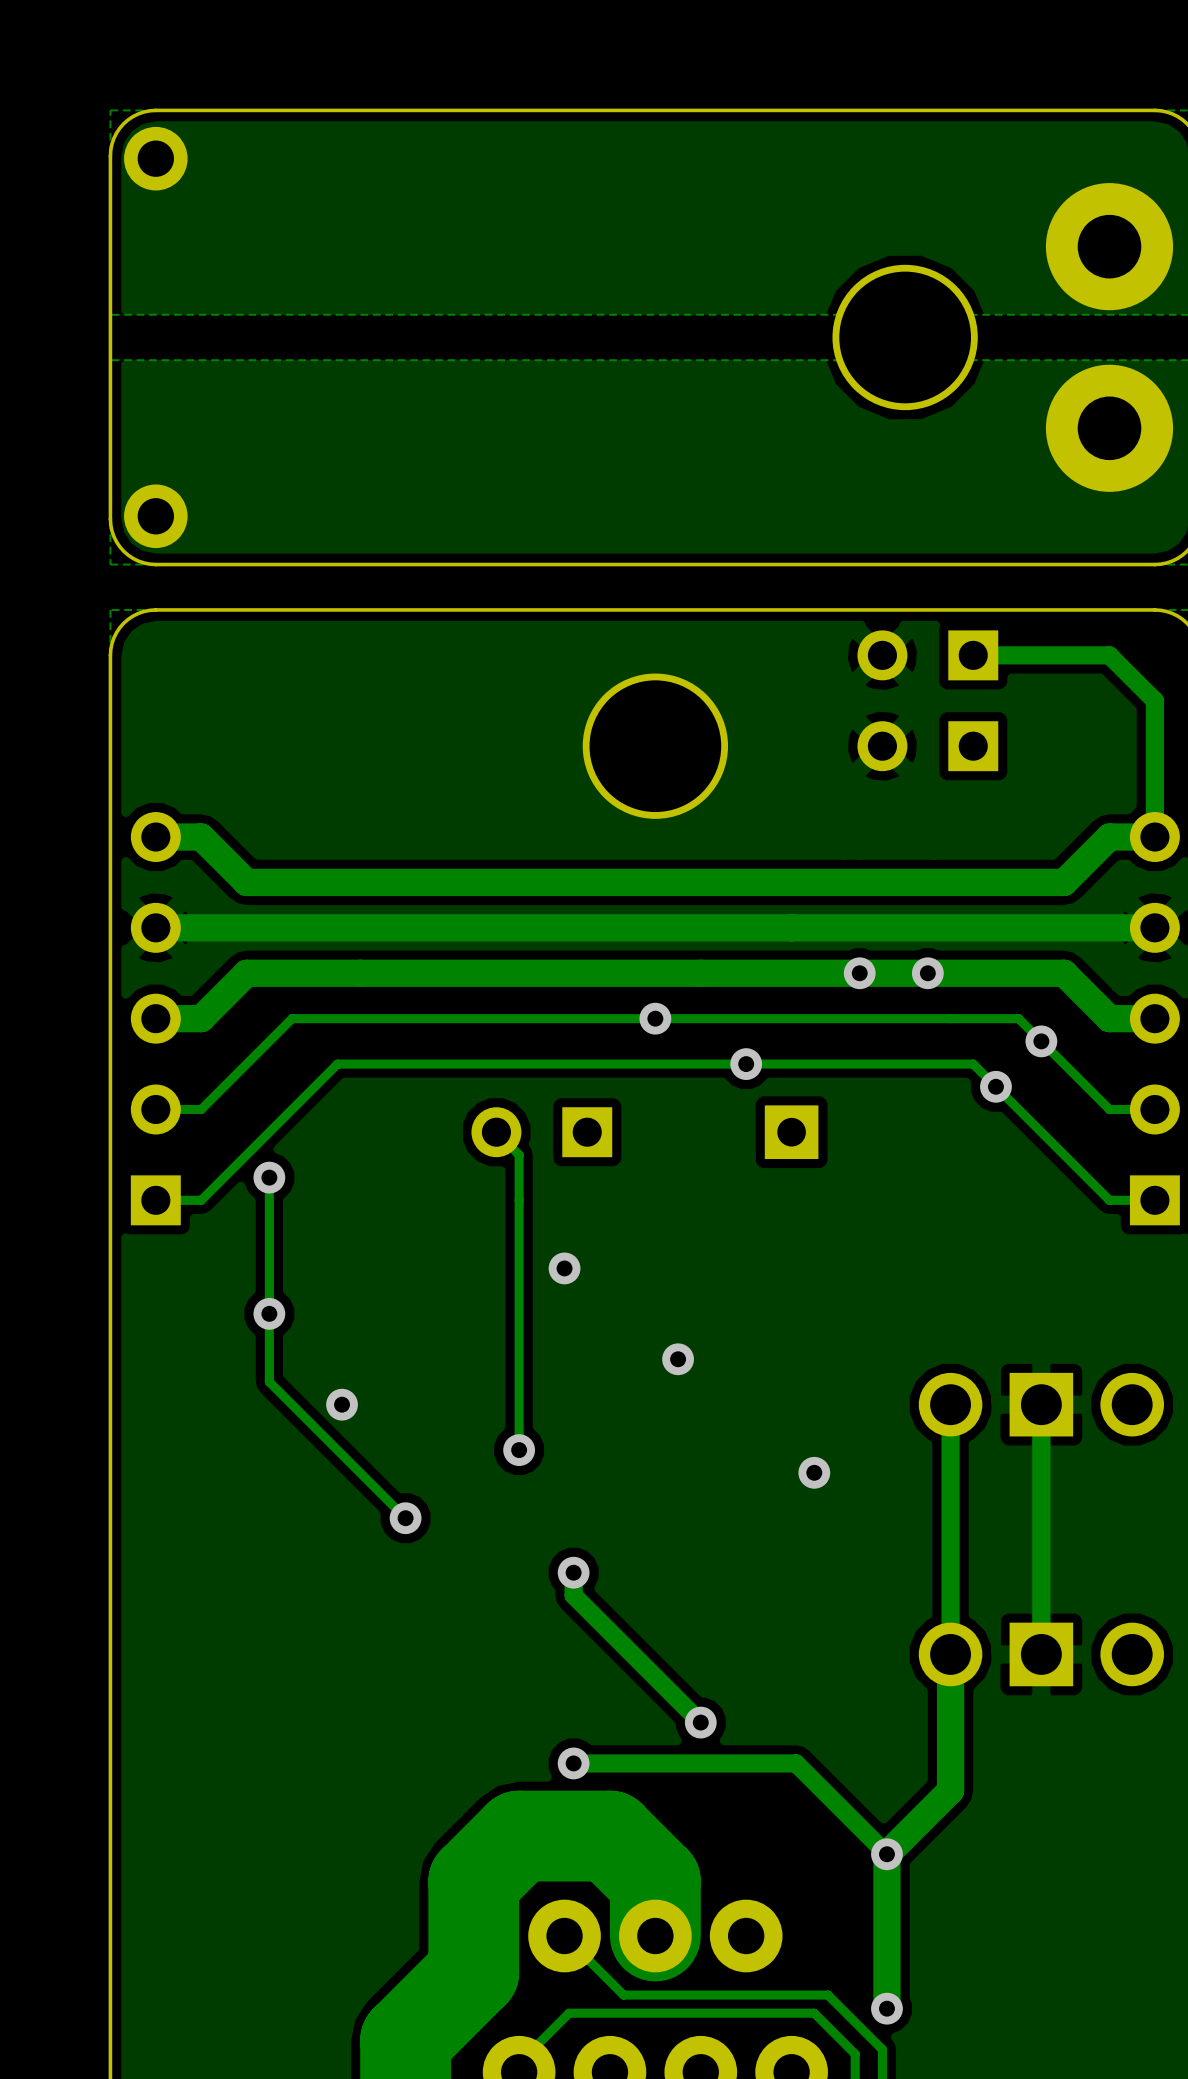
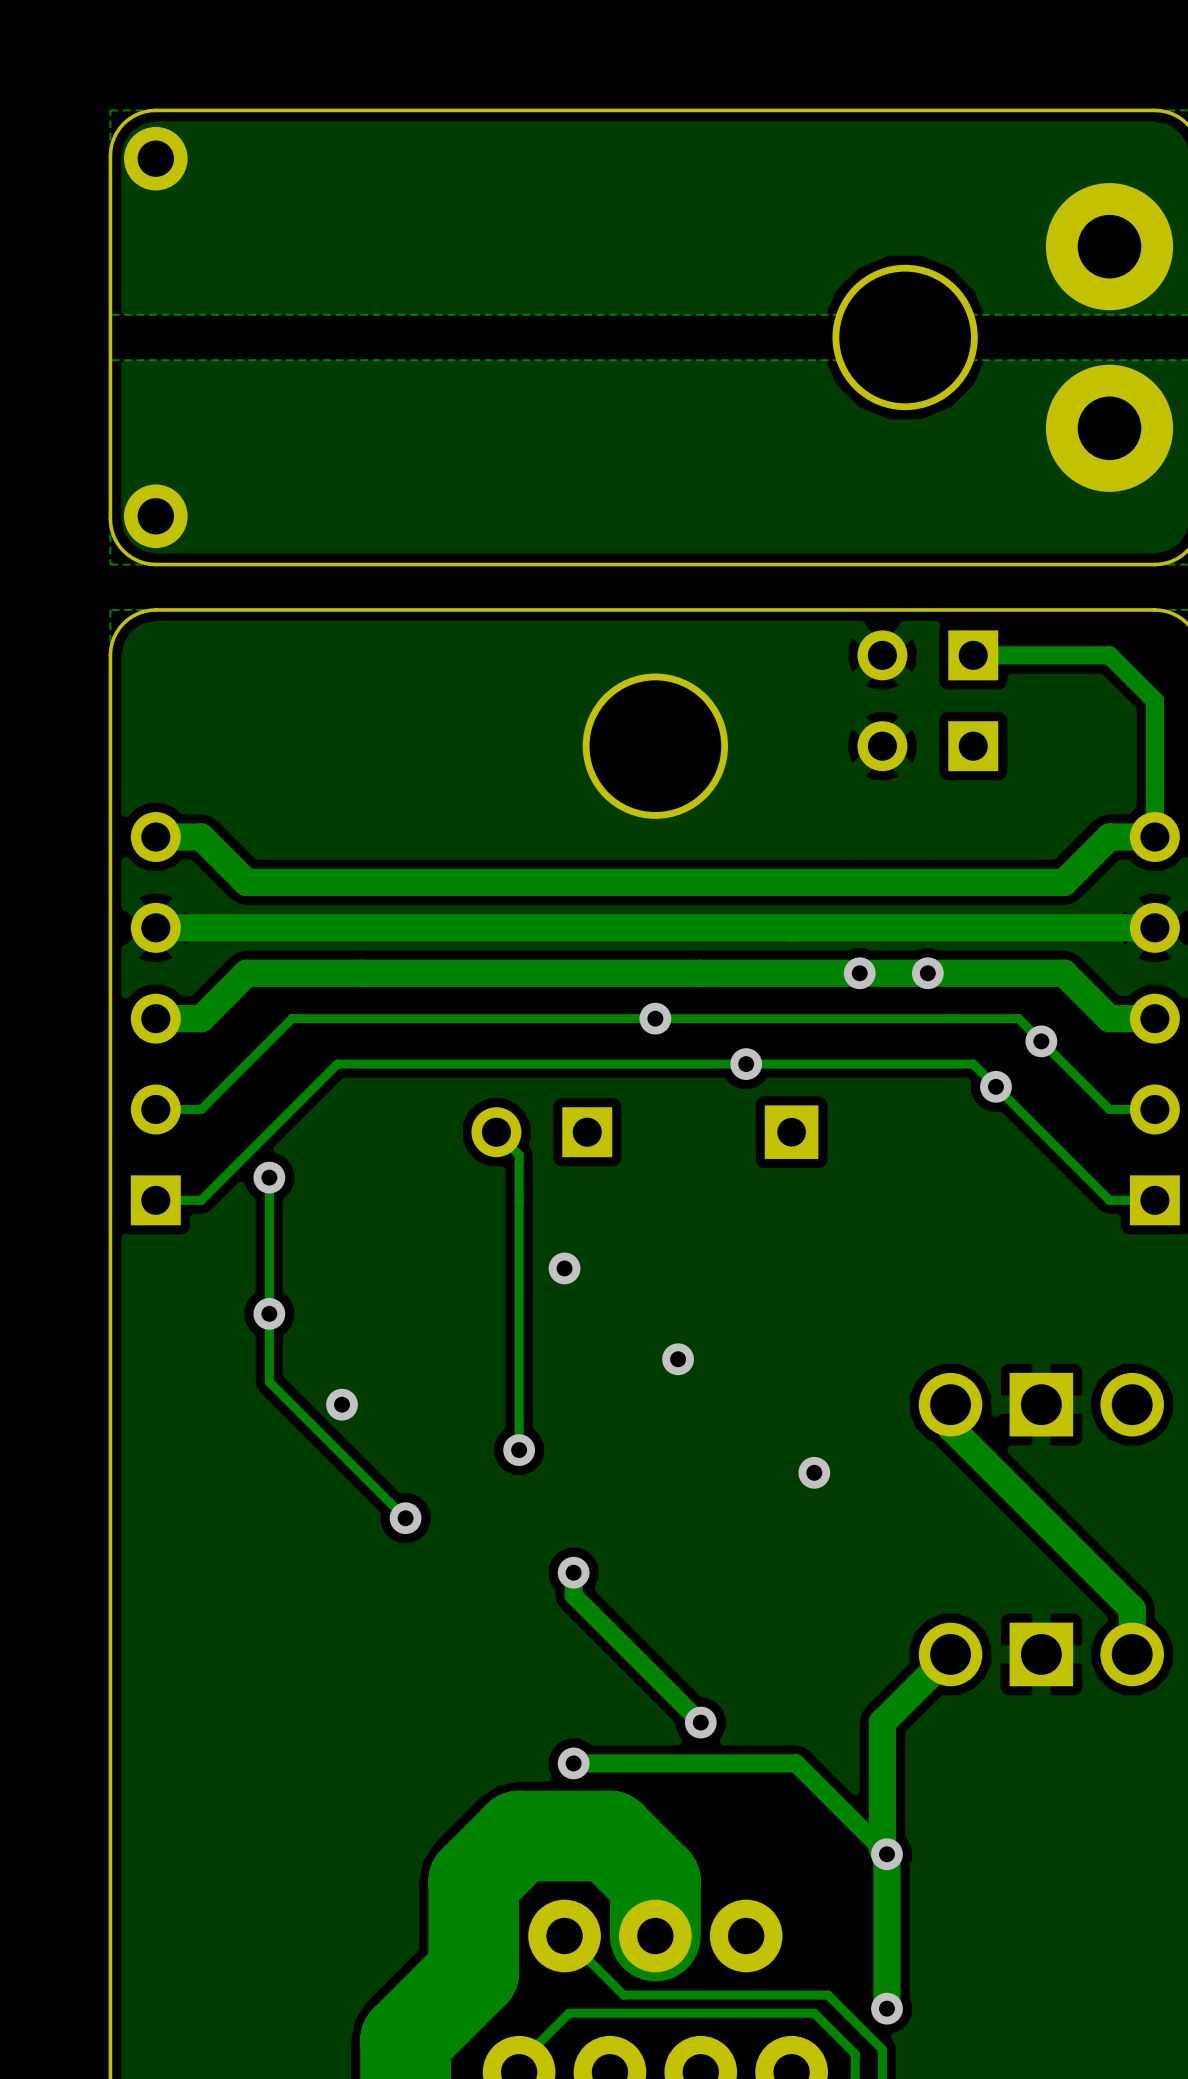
track: (1041, 1404) (1041, 1654) -> none
track: (950, 1427) (950, 1790) (886, 1854) -> (950, 1427) (1132, 1609) (1132, 1654)
track: none -> (950, 1654) (882, 1722) (882, 1849)

